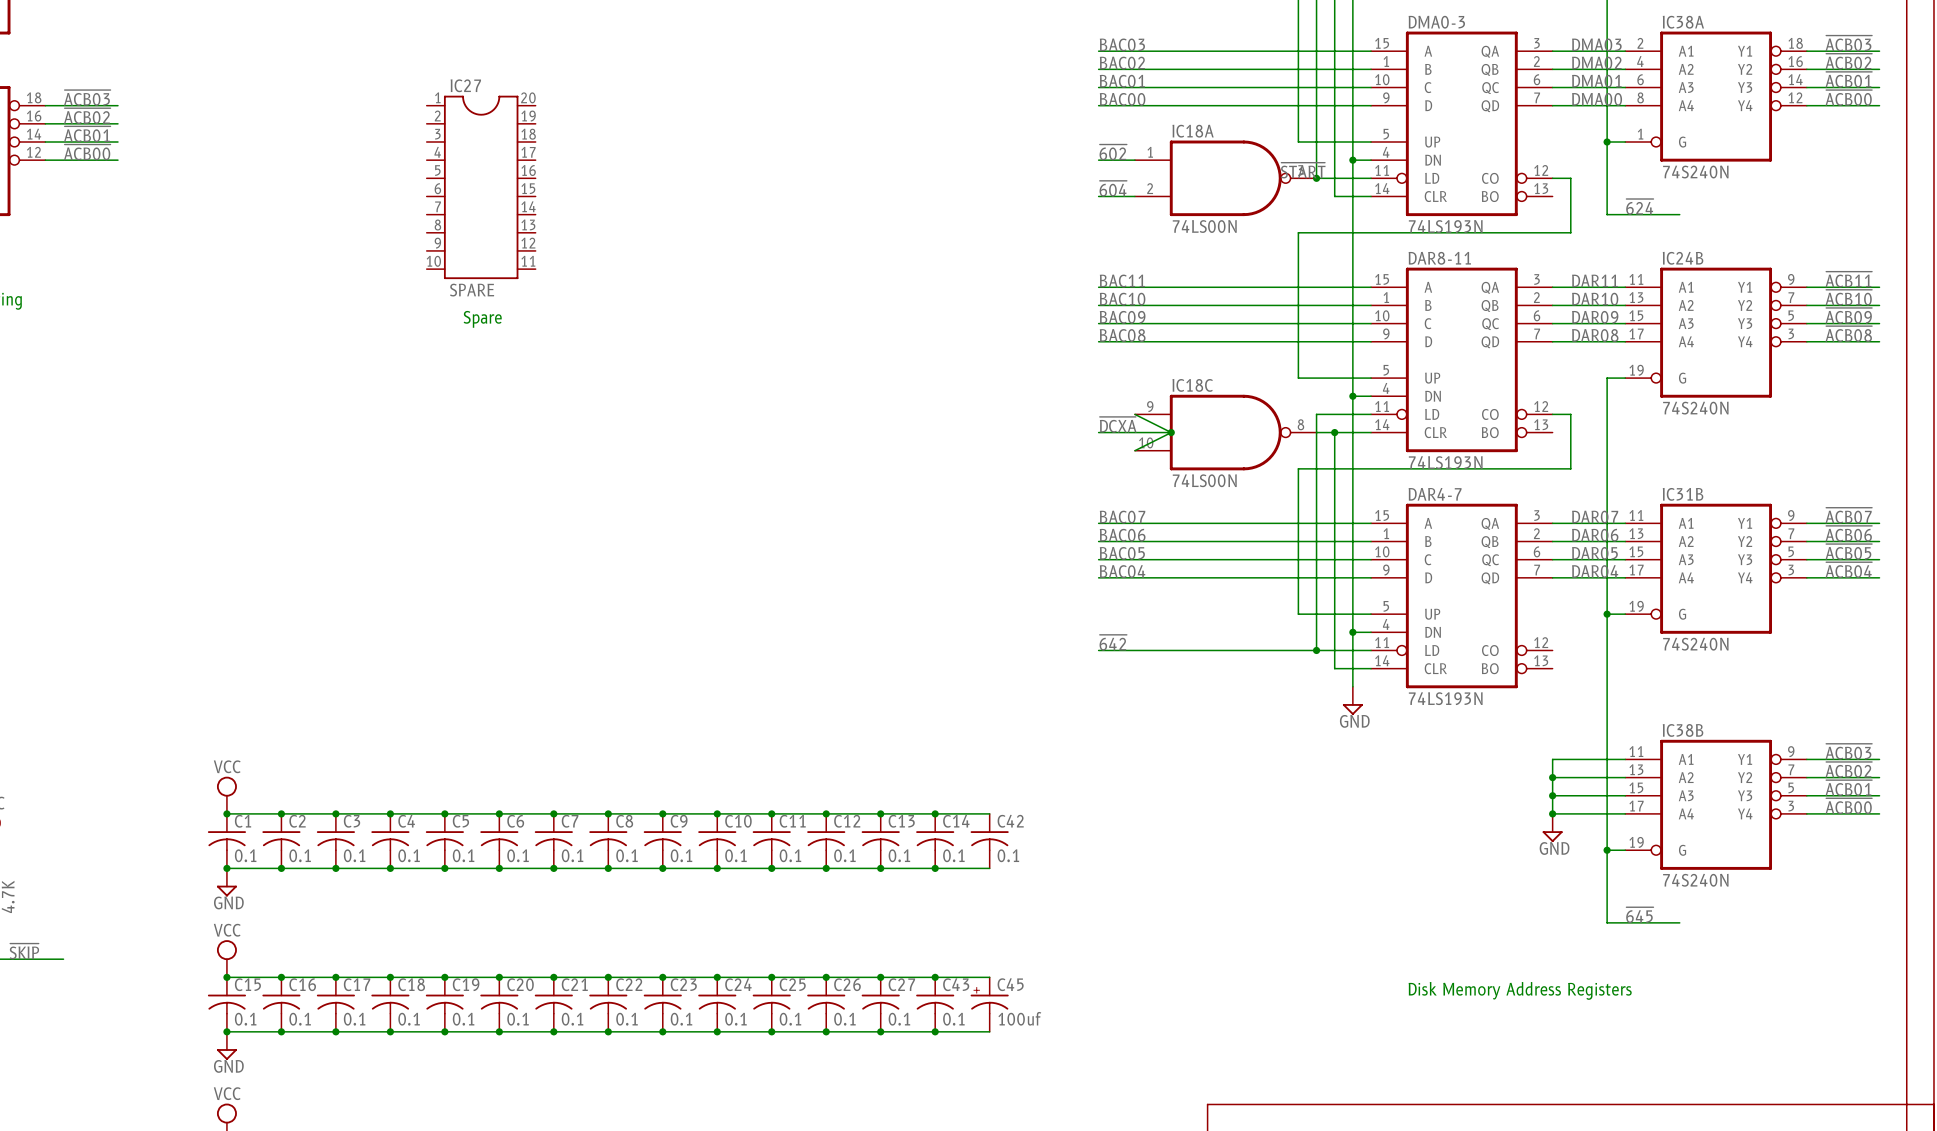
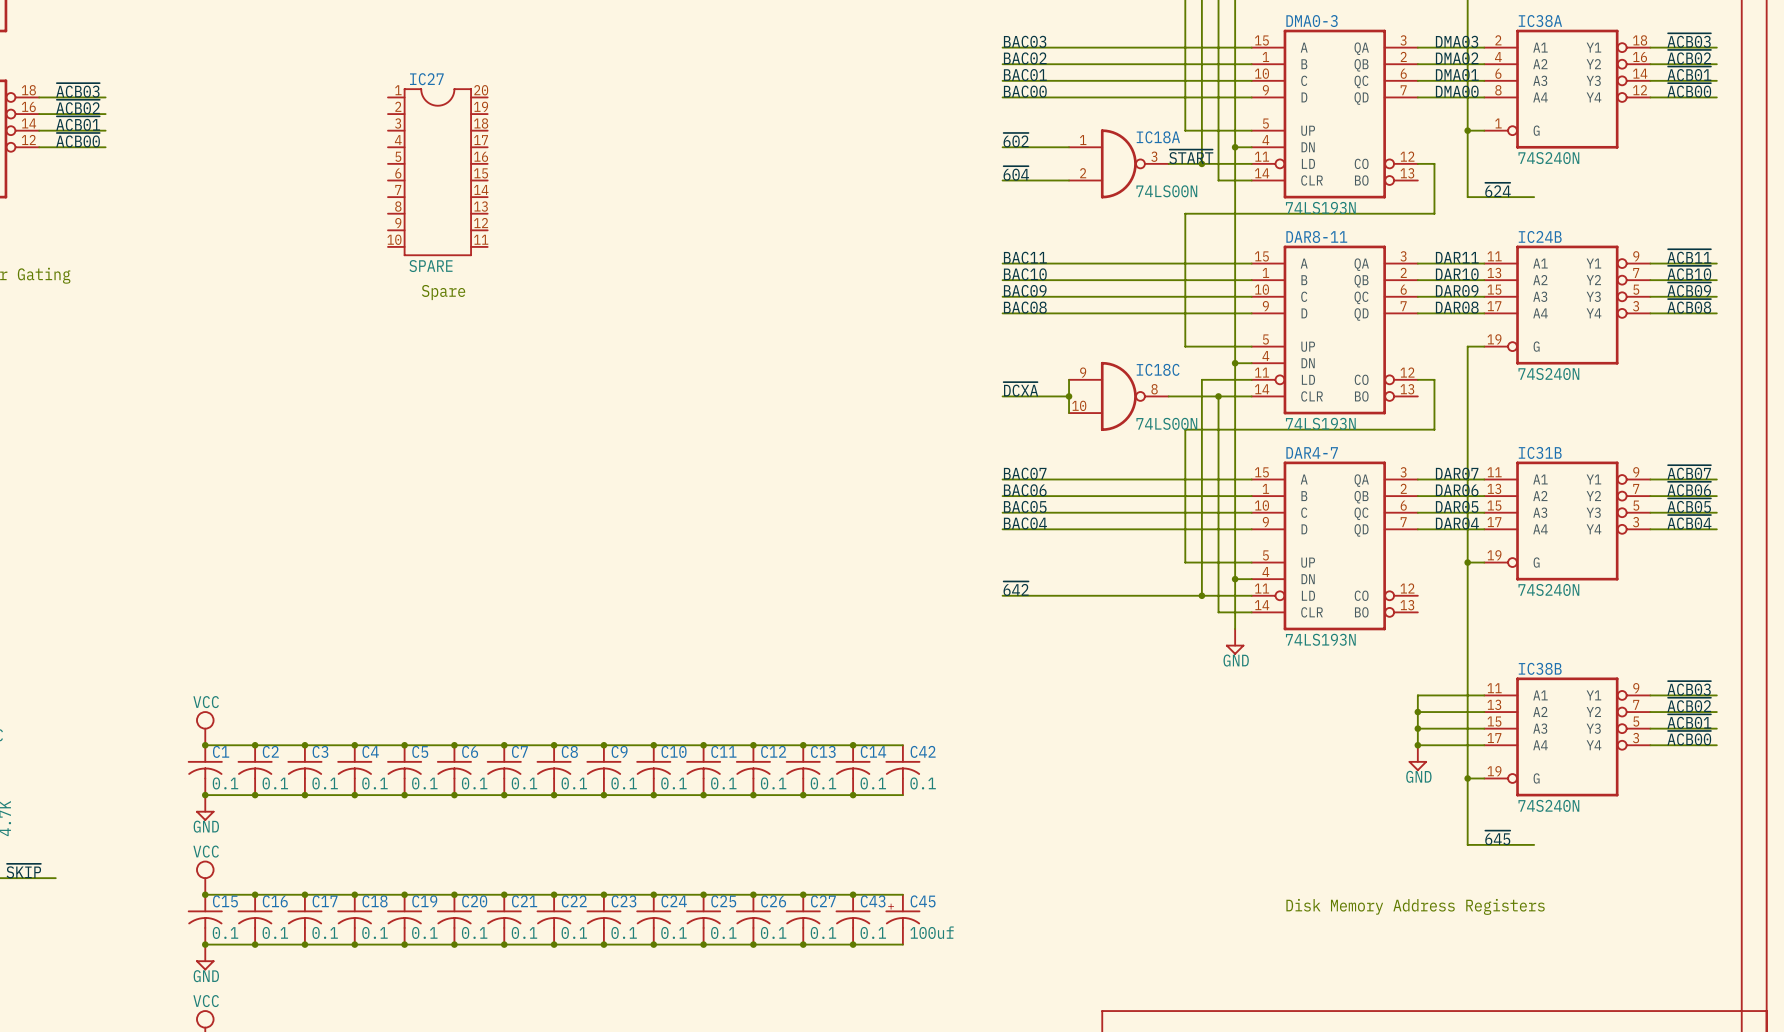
IC18A name position: IC18A (1193, 131) -> IC18A (1158, 137)
IC18A symbol: [1134, 140, 1317, 217] -> [1069, 129, 1169, 199]
IC18A value position: 74LS00N (1204, 226) -> 74LS00N (1166, 191)
IC18C name position: IC18C (1192, 385) -> IC18C (1158, 369)
IC18C symbol: [1134, 394, 1317, 471] -> [1069, 361, 1169, 431]
wire: (1134, 414) (1171, 432) (1134, 450) -> none
IC18C value position: 74LS00N (1204, 480) -> 74LS00N (1166, 423)

